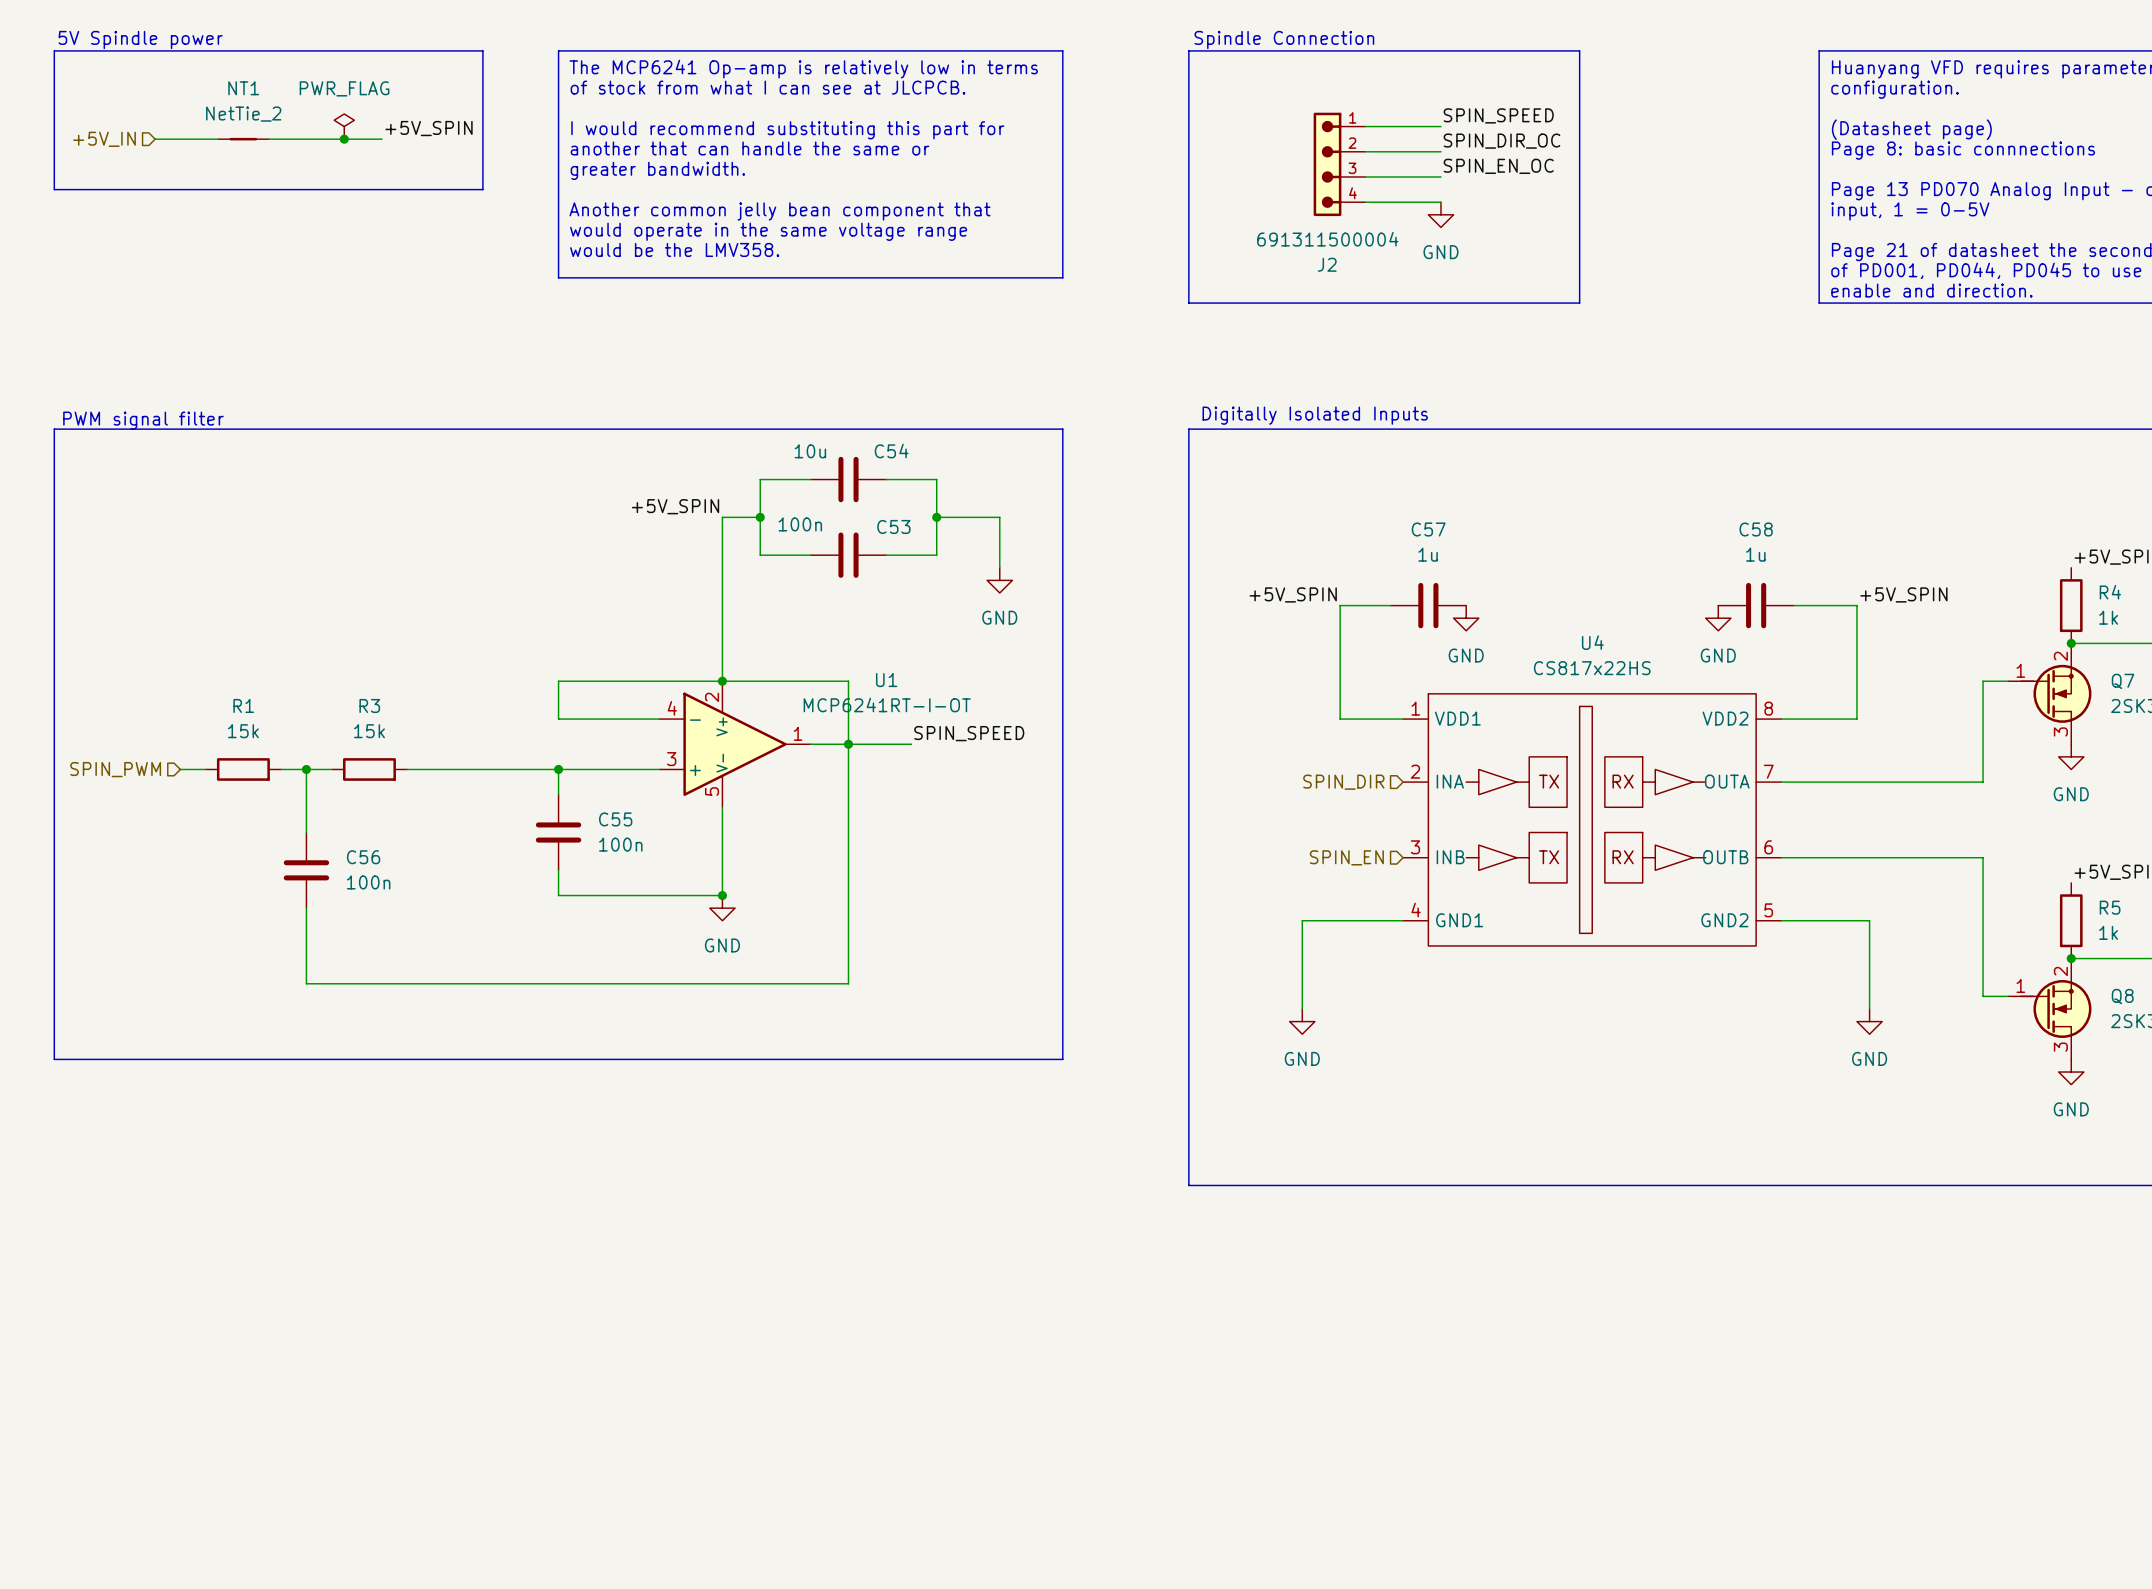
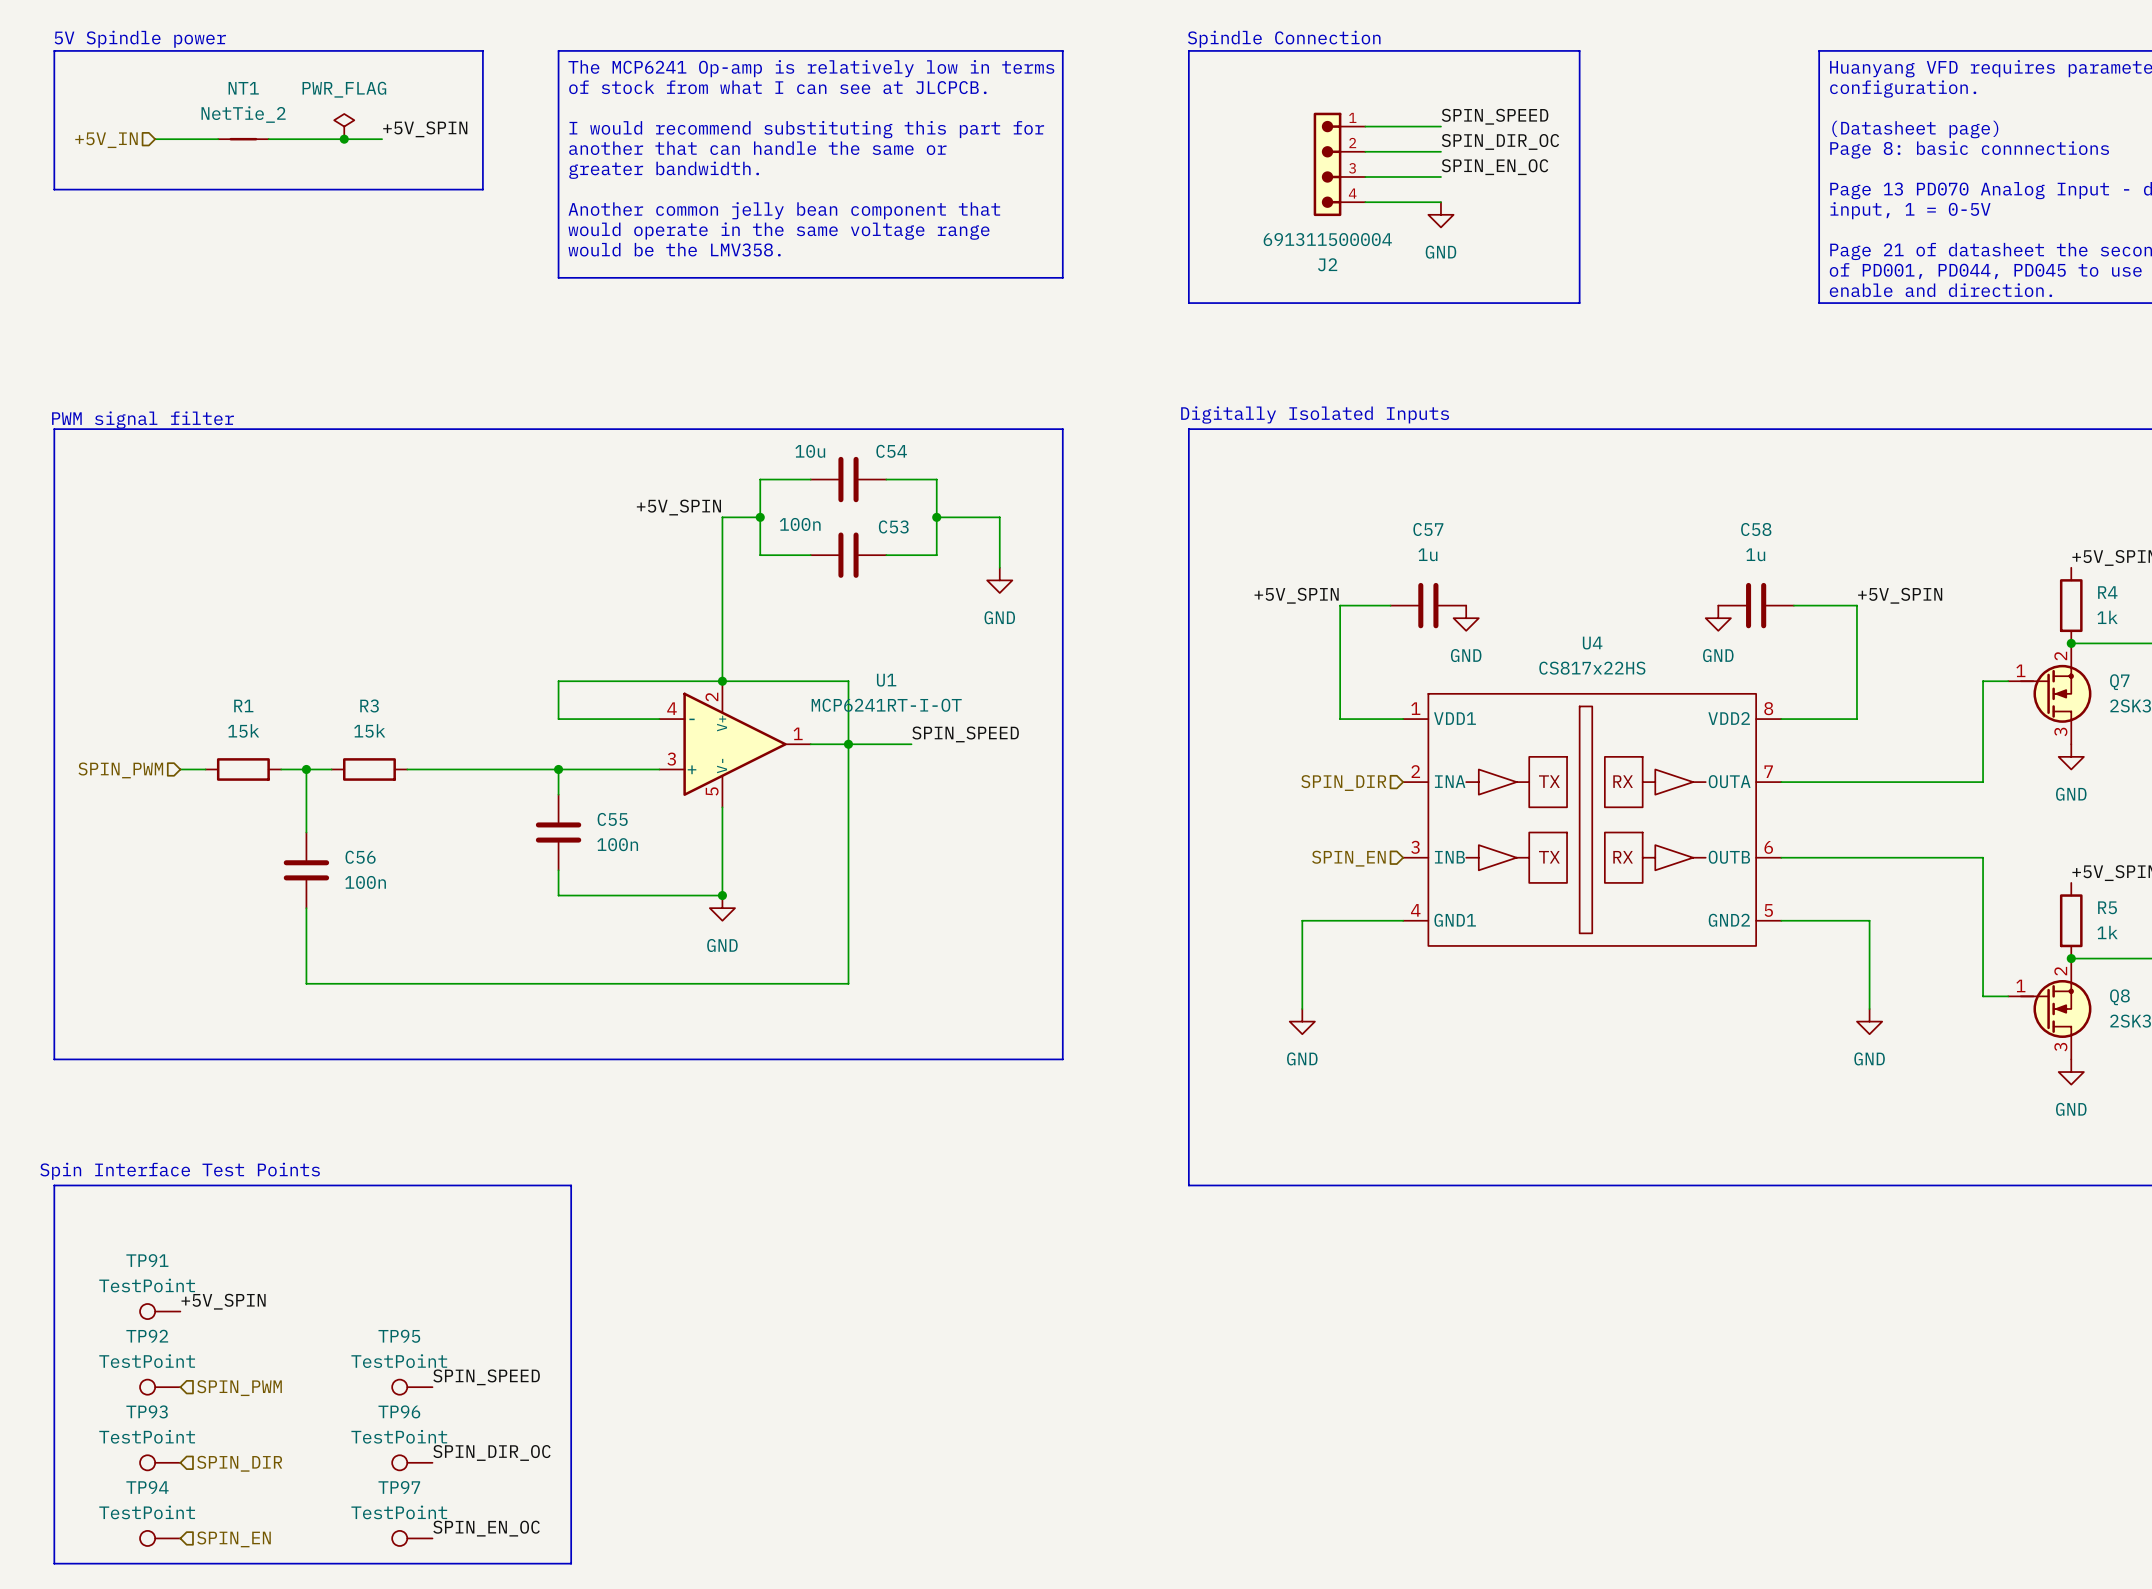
text: none -> Spin Interface Test Points (180, 1171)
line: none -> (54, 1185) (571, 1185) (571, 1563) (54, 1563) (54, 1185)
label: none -> +5V_SPIN (223, 1301)
TP91: none -> TestPoint (160, 1311)
label: none -> SPIN_SPEED (486, 1377)
TP92: none -> TestPoint (160, 1387)
hierarchical label: none -> SPIN_PWM (239, 1388)
TP95: none -> TestPoint (412, 1387)
label: none -> SPIN_DIR_OC (491, 1452)
TP93: none -> TestPoint (160, 1462)
hierarchical label: none -> SPIN_DIR (239, 1463)
TP96: none -> TestPoint (412, 1462)
label: none -> SPIN_EN_OC (486, 1528)
TP94: none -> TestPoint (160, 1538)
hierarchical label: none -> SPIN_EN (234, 1539)
TP97: none -> TestPoint (412, 1538)

